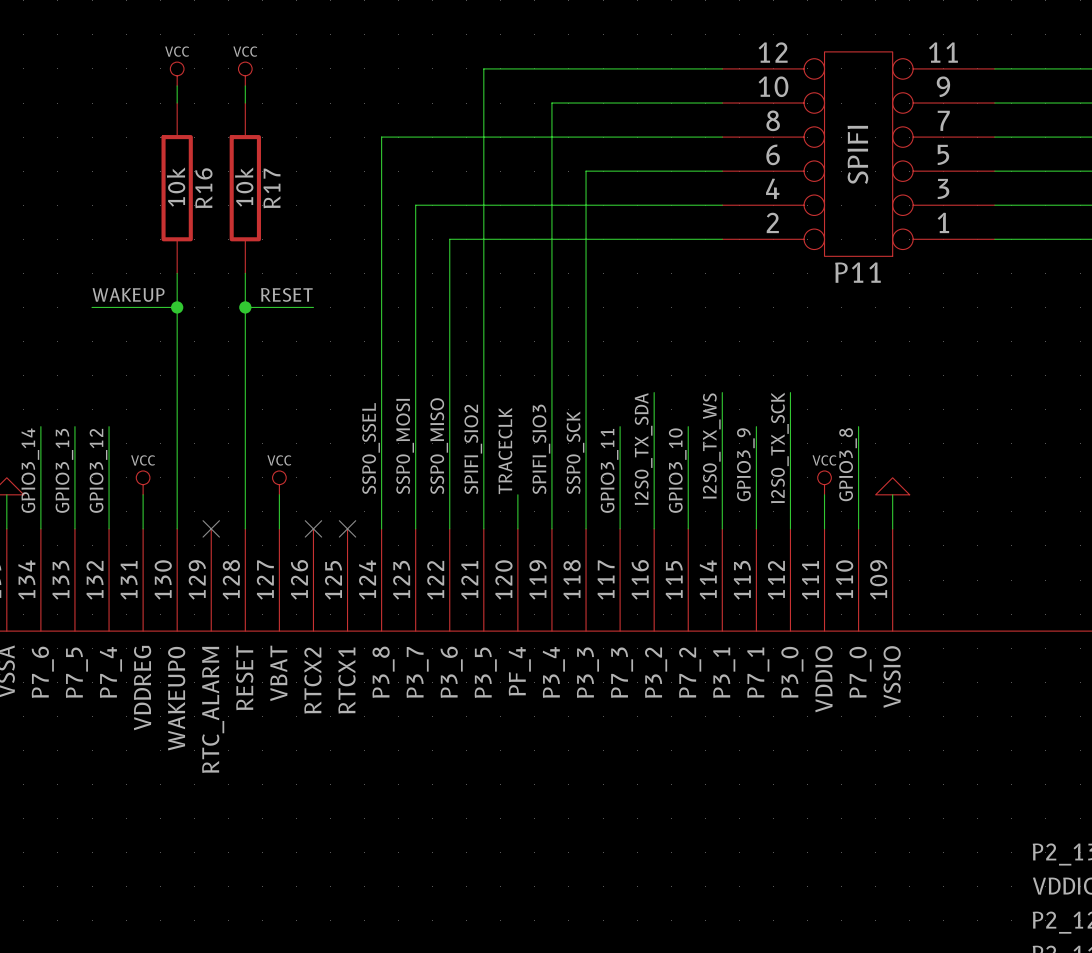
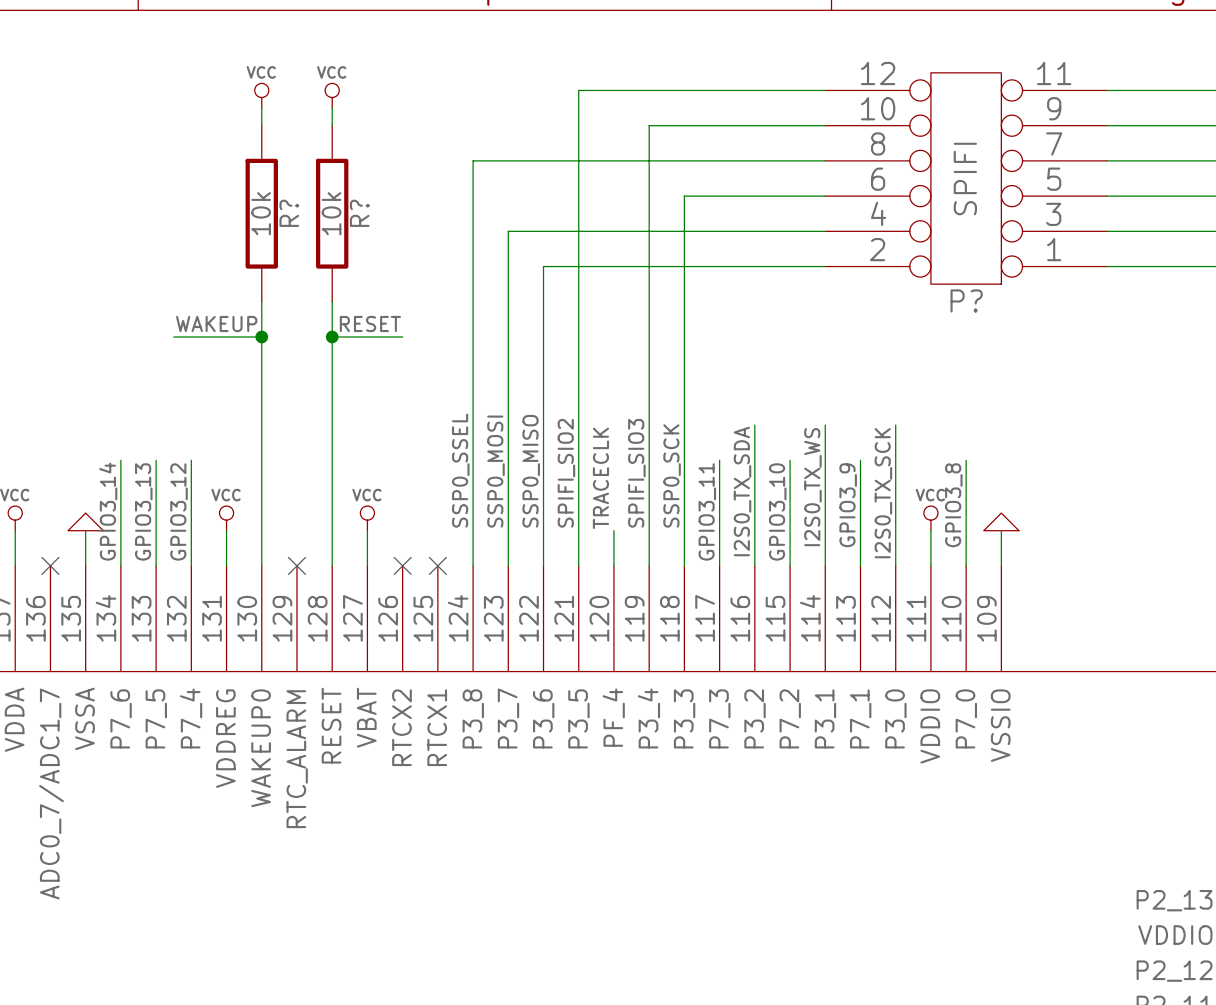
R16 name: R16 (203, 188) -> R? (289, 213)
R17 name: R17 (271, 188) -> R? (359, 213)
P11 name: P11 (857, 272) -> P? (966, 300)

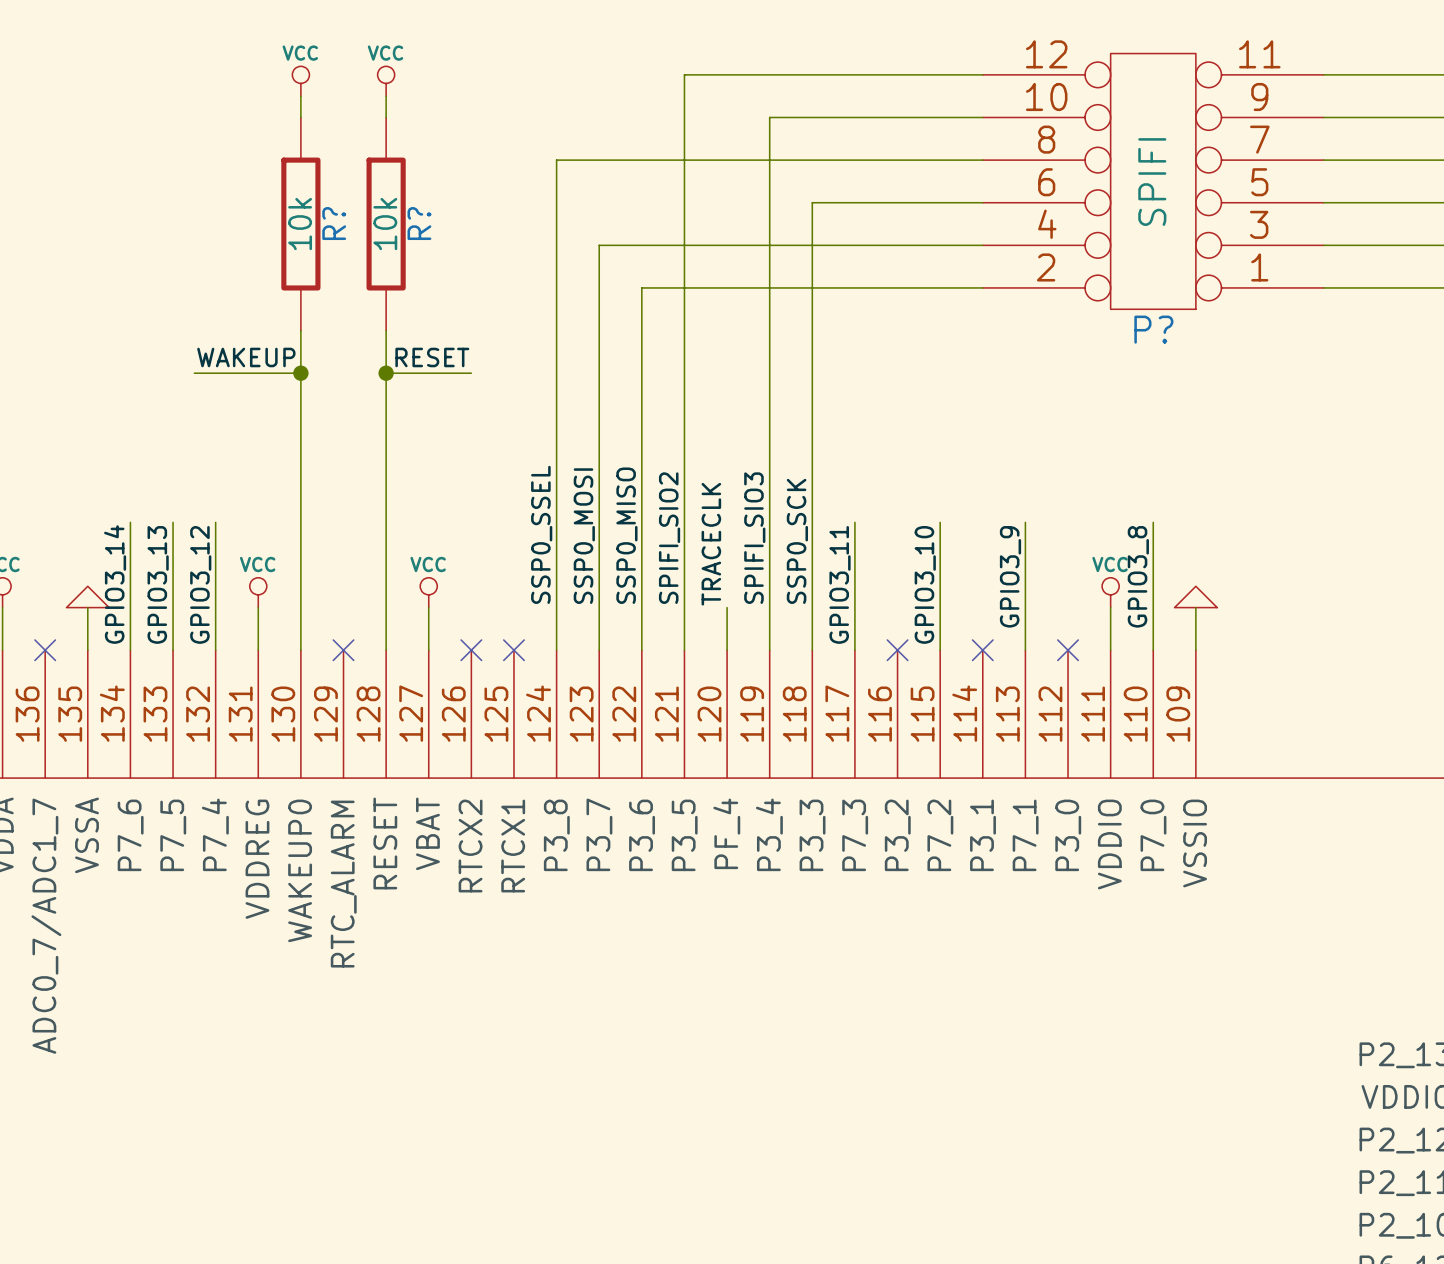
wire: (754, 425) (754, 565) -> none
wire: (825, 425) (825, 565) -> none
wire: (895, 425) (895, 565) -> none
label: I2S0_TX_WS (812, 487) -> none
label: I2S0_TX_SDA (742, 491) -> none
label: I2S0_TX_SCK (883, 493) -> none
no-connect mark: none -> (897, 650)
no-connect mark: none -> (982, 650)
no-connect mark: none -> (1068, 650)

